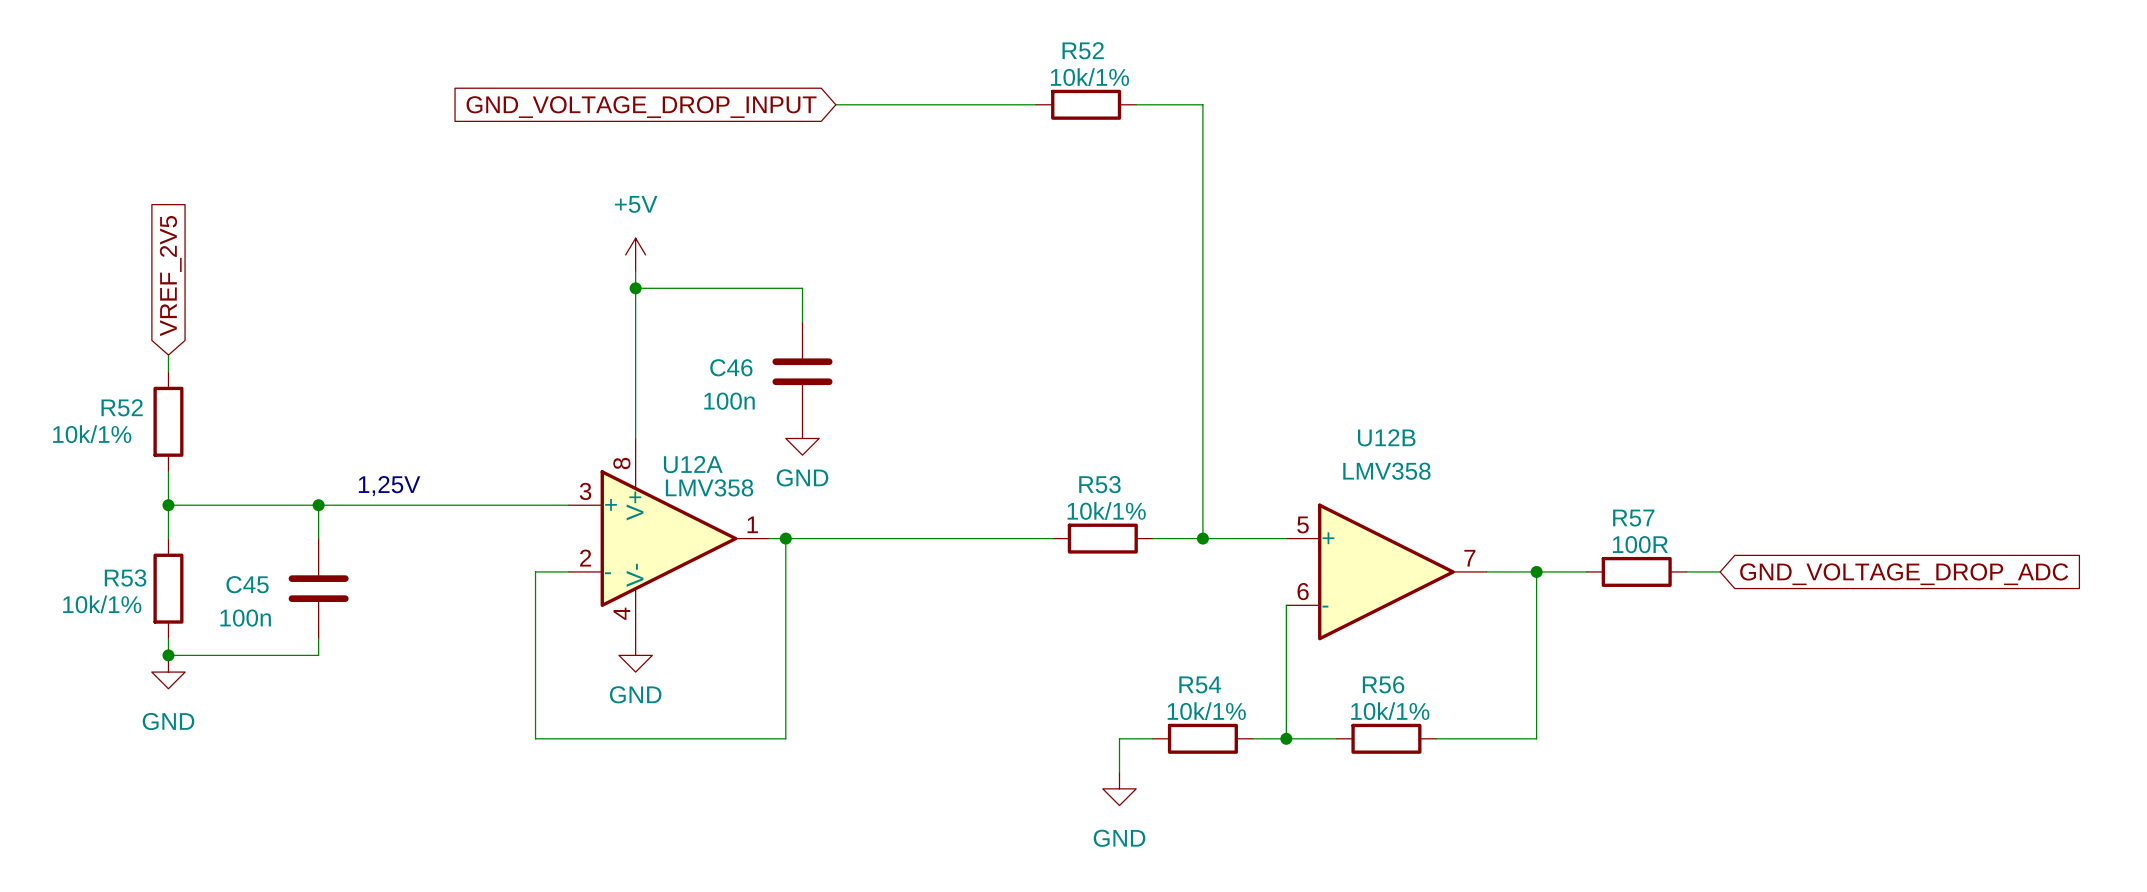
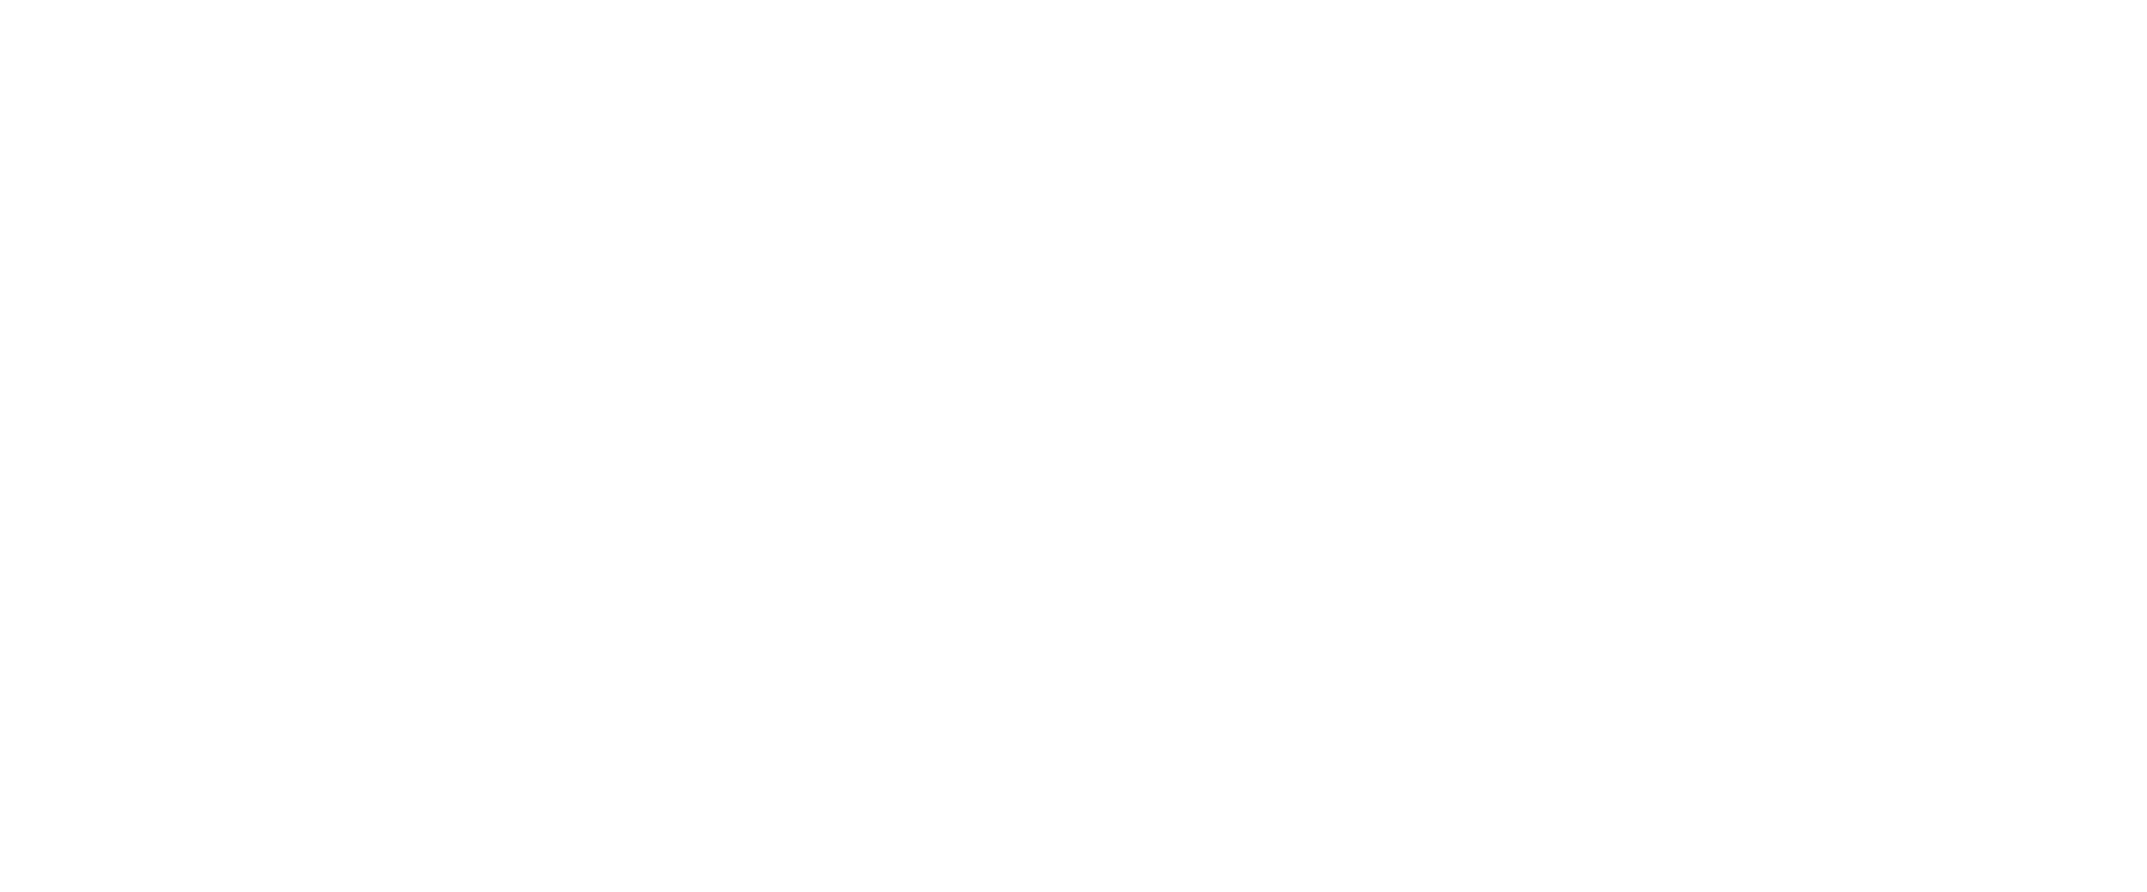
wire: (835, 104) (1036, 104) -> none
R52: 10k/1% (1086, 104) -> none
wire: (1136, 104) (1202, 104) (1202, 538) -> none
global label: GND_VOLTAGE_DROP_INPUT (641, 107) -> none
power symbol: +5V (635, 254) -> none
wire: (635, 271) (635, 438) -> none
global label: VREF_2V5 (170, 276) -> none
wire: (635, 288) (802, 288) (802, 321) -> none
junction: (635, 288) -> none
wire: (168, 355) (168, 371) -> none
C46: 100n (802, 371) -> none
R52: 10k/1% (168, 421) -> none
power symbol: GND (802, 438) -> none
wire: (168, 471) (168, 538) -> none
text: 1,25V (389, 486) -> none
wire: (168, 505) (568, 505) -> none
junction: (168, 505) -> none
wire: (318, 505) (318, 538) -> none
junction: (318, 505) -> none
part: (635, 538) -> none
U12A: LMV358 (669, 538) -> none
wire: (769, 538) (1052, 538) -> none
wire: (785, 538) (785, 738) (535, 738) (535, 571) (568, 571) -> none
junction: (785, 538) -> none
R53: 10k/1% (1102, 538) -> none
wire: (1152, 538) (1286, 538) -> none
junction: (1202, 538) -> none
U12B: LMV358 (1386, 571) -> none
wire: (1486, 571) (1586, 571) -> none
wire: (1536, 571) (1536, 738) (1436, 738) -> none
junction: (1536, 571) -> none
R57: 100R (1636, 571) -> none
wire: (1686, 571) (1720, 571) -> none
global label: GND_VOLTAGE_DROP_ADC (1904, 574) -> none
R53: 10k/1% (168, 588) -> none
C45: 100n (318, 588) -> none
wire: (1286, 605) (1286, 738) -> none
wire: (168, 638) (168, 655) (318, 655) (318, 638) -> none
junction: (168, 655) -> none
power symbol: GND (635, 655) -> none
power symbol: GND (168, 672) -> none
wire: (1152, 738) (1119, 738) (1119, 772) -> none
R54: 10k/1% (1202, 738) -> none
wire: (1252, 738) (1336, 738) -> none
junction: (1286, 738) -> none
R56: 10k/1% (1386, 738) -> none
power symbol: GND (1119, 788) -> none

